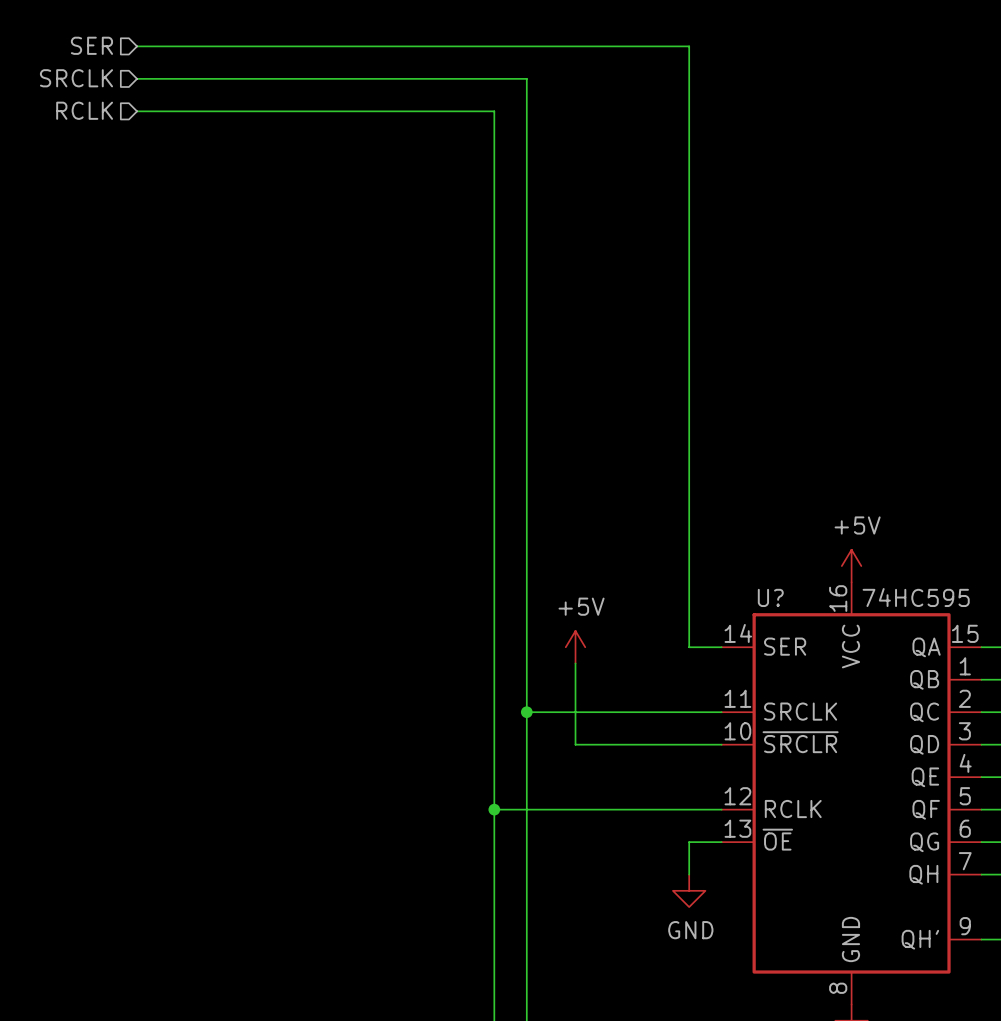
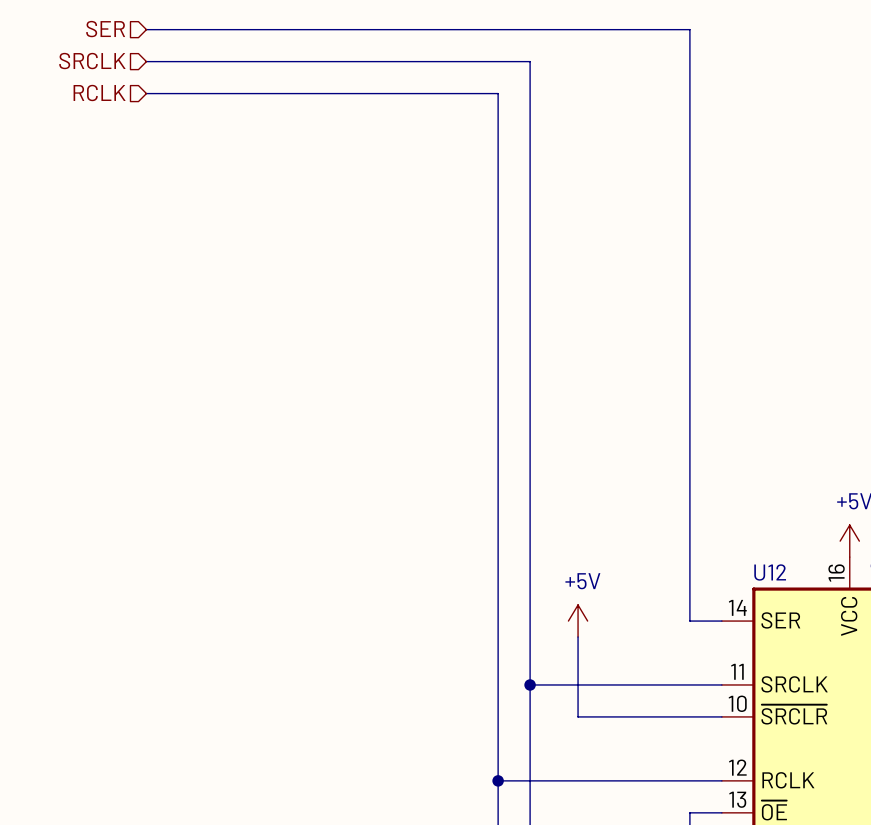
U? name: U? (770, 597) -> U12 (770, 572)

